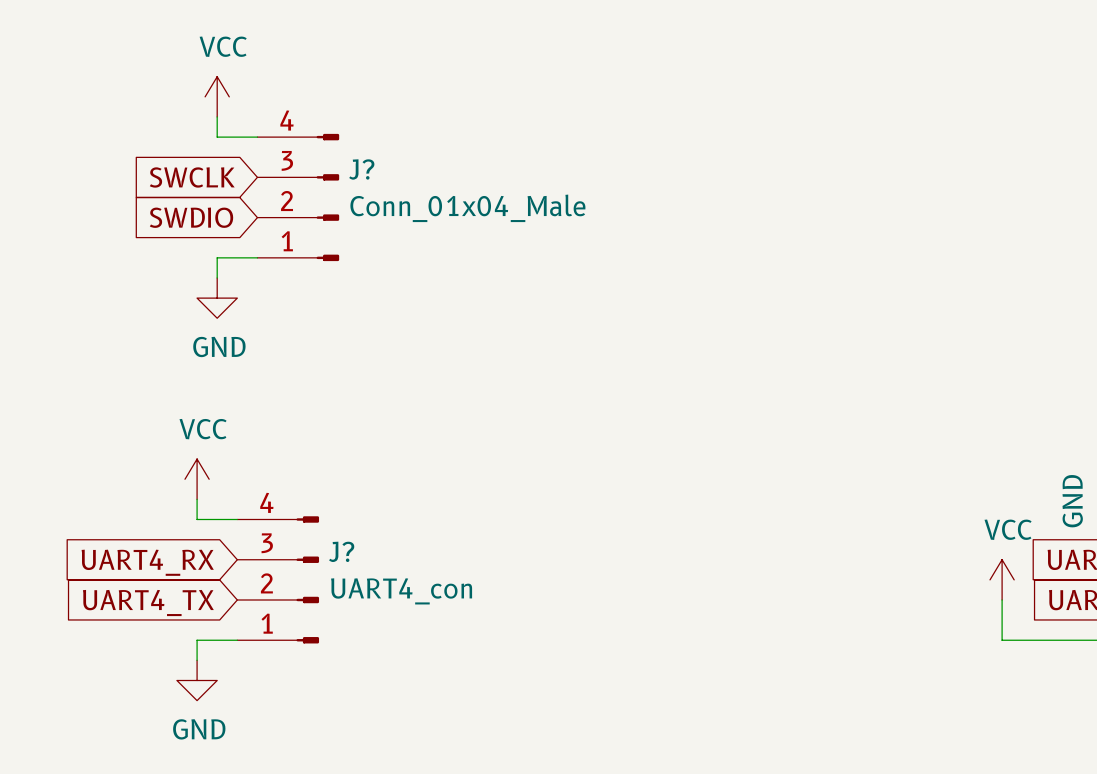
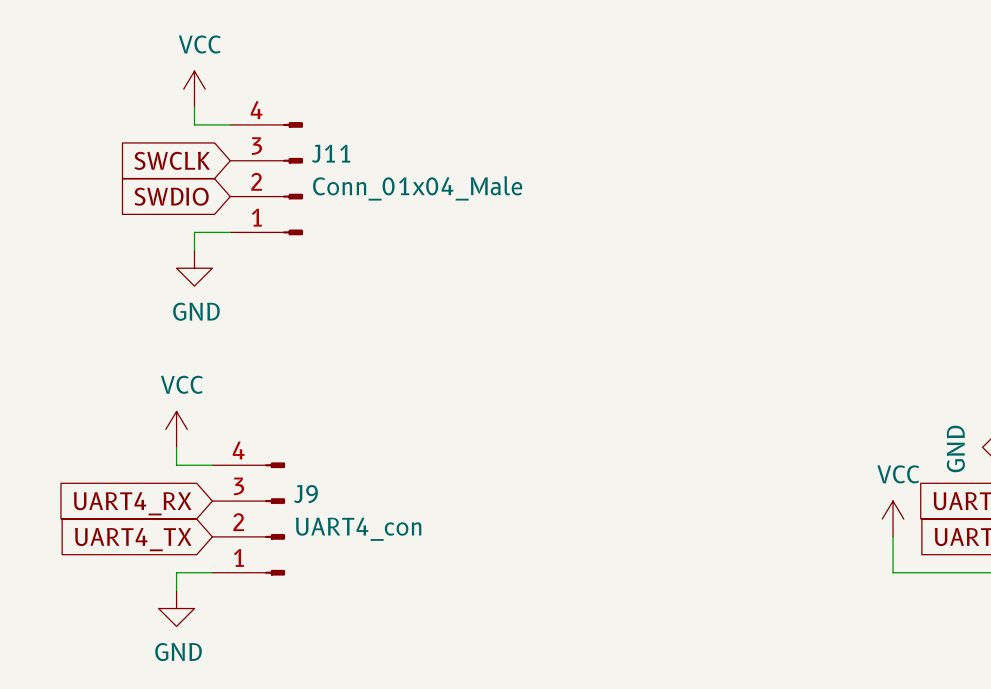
J? name: J? (361, 169) -> J11 (331, 153)
J? name: J? (341, 551) -> J9 (305, 494)

